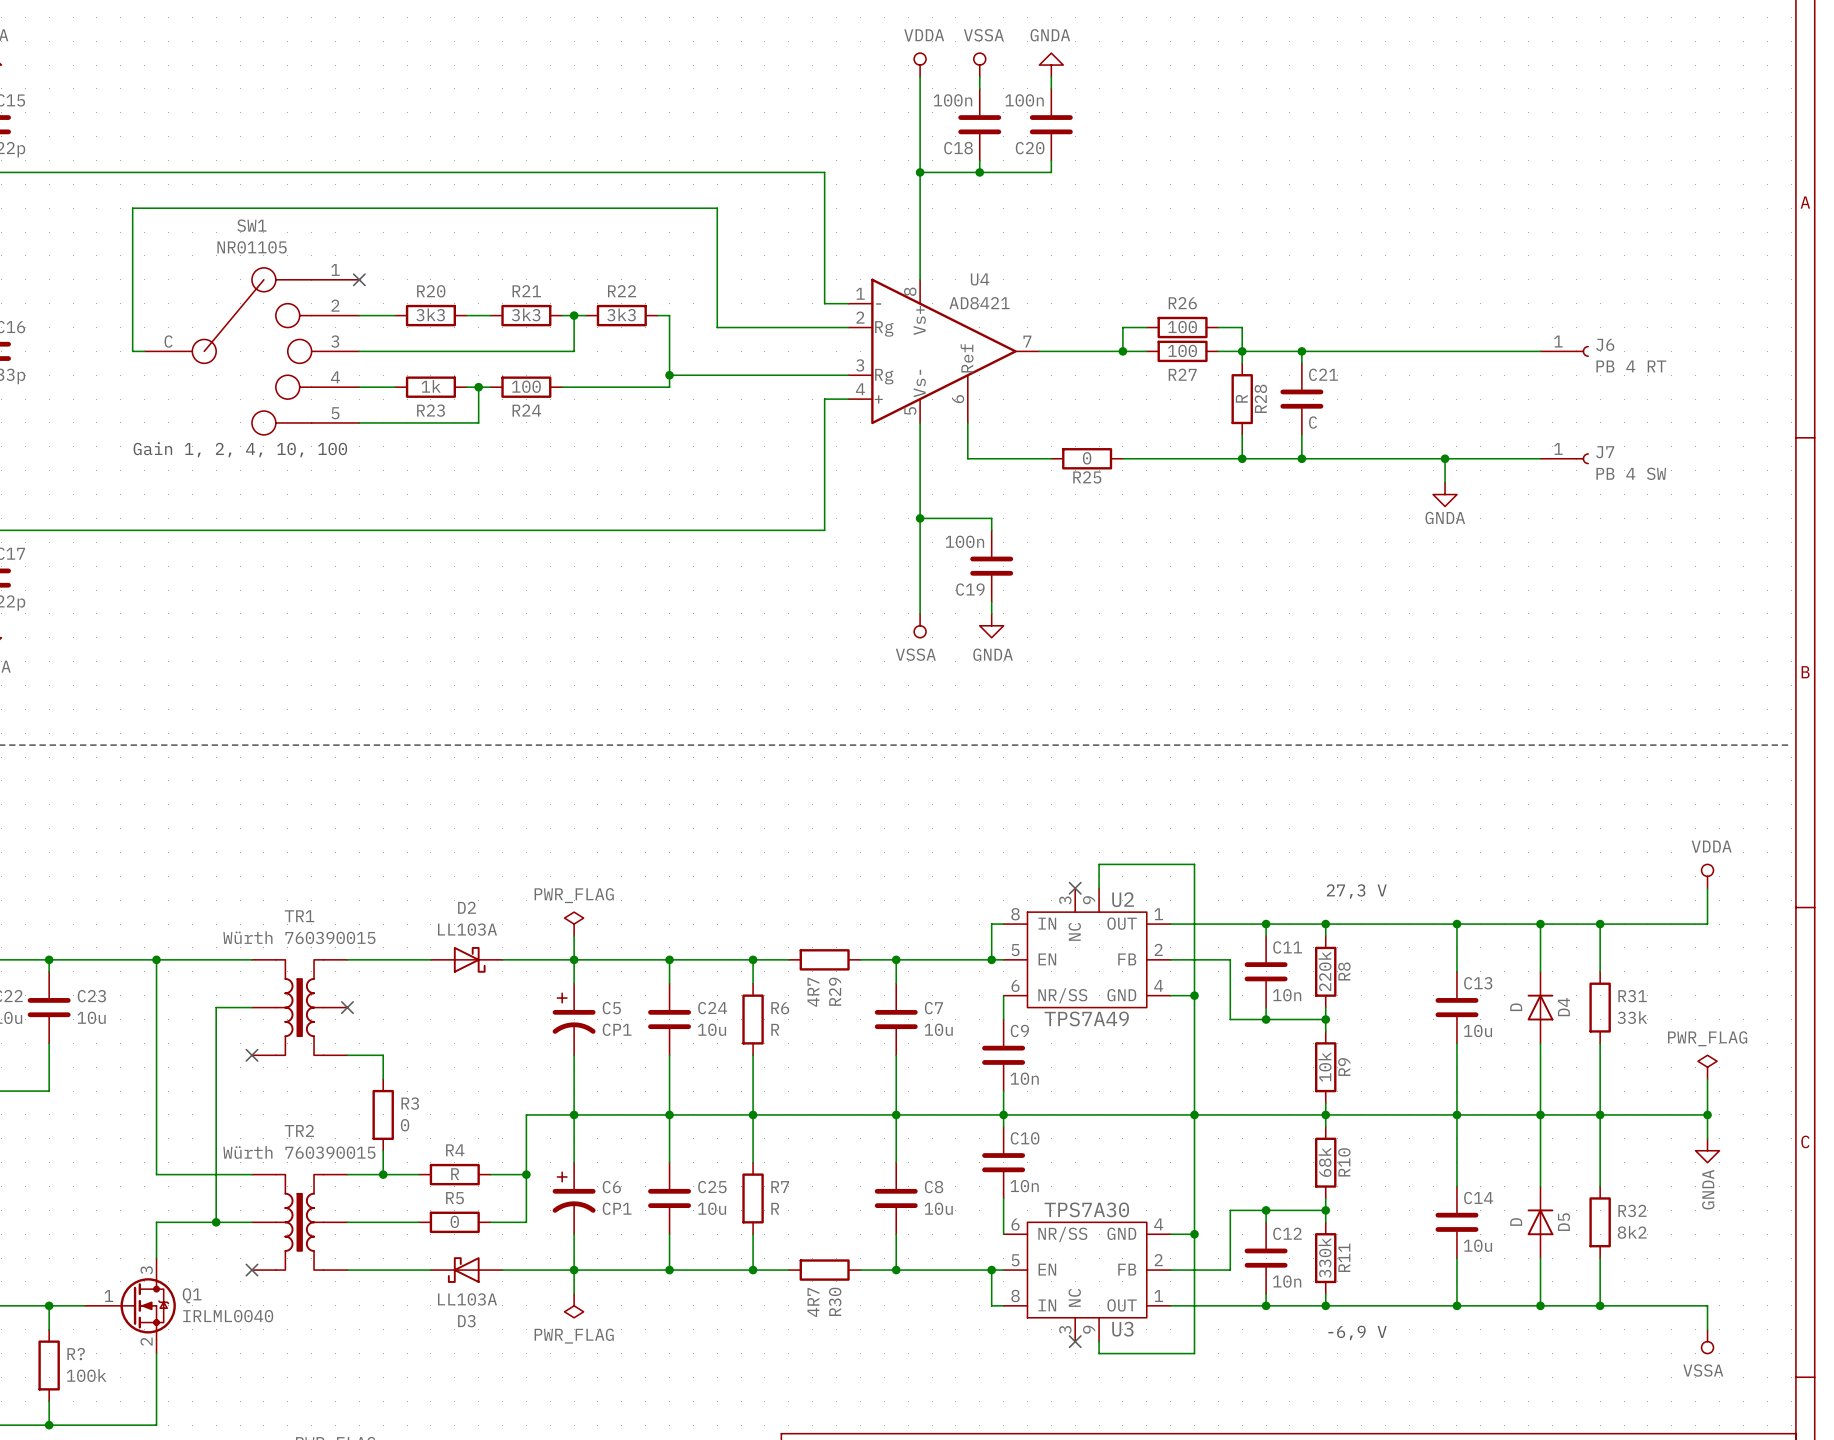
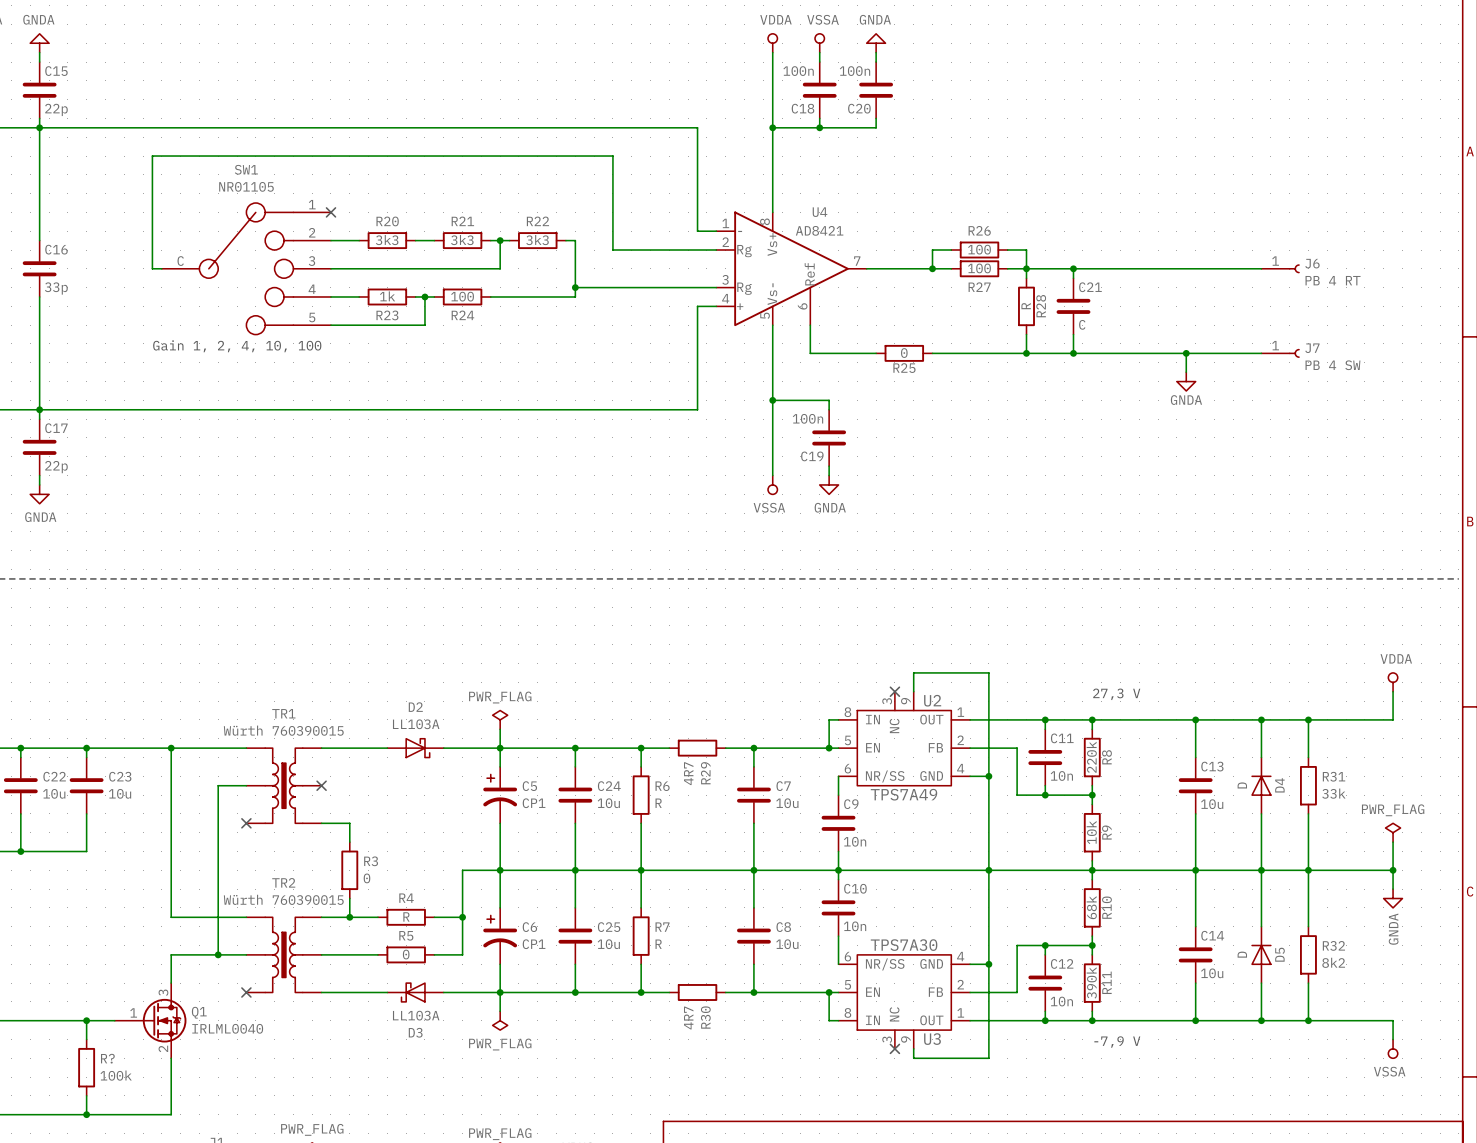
R11 value: 330k (1325, 1257) -> 390k (1091, 982)
text: -6,9 V (1357, 1332) -> -7,9 V (1117, 1042)

